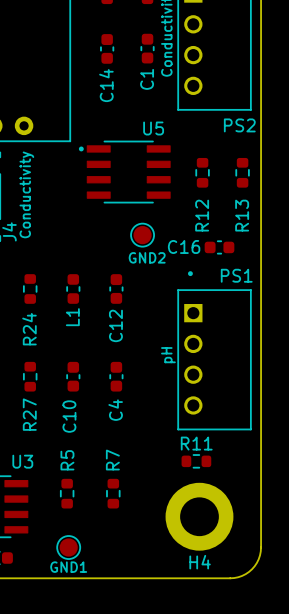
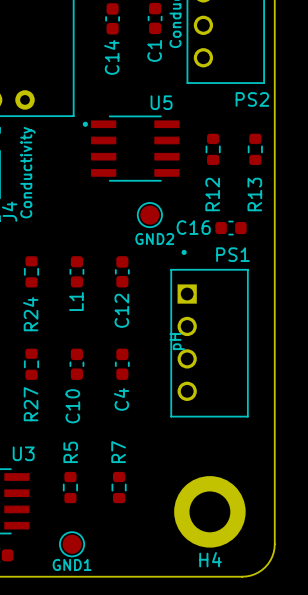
PS1 position: (214, 350) -> (209, 333)
R11: (196, 461) -> none

